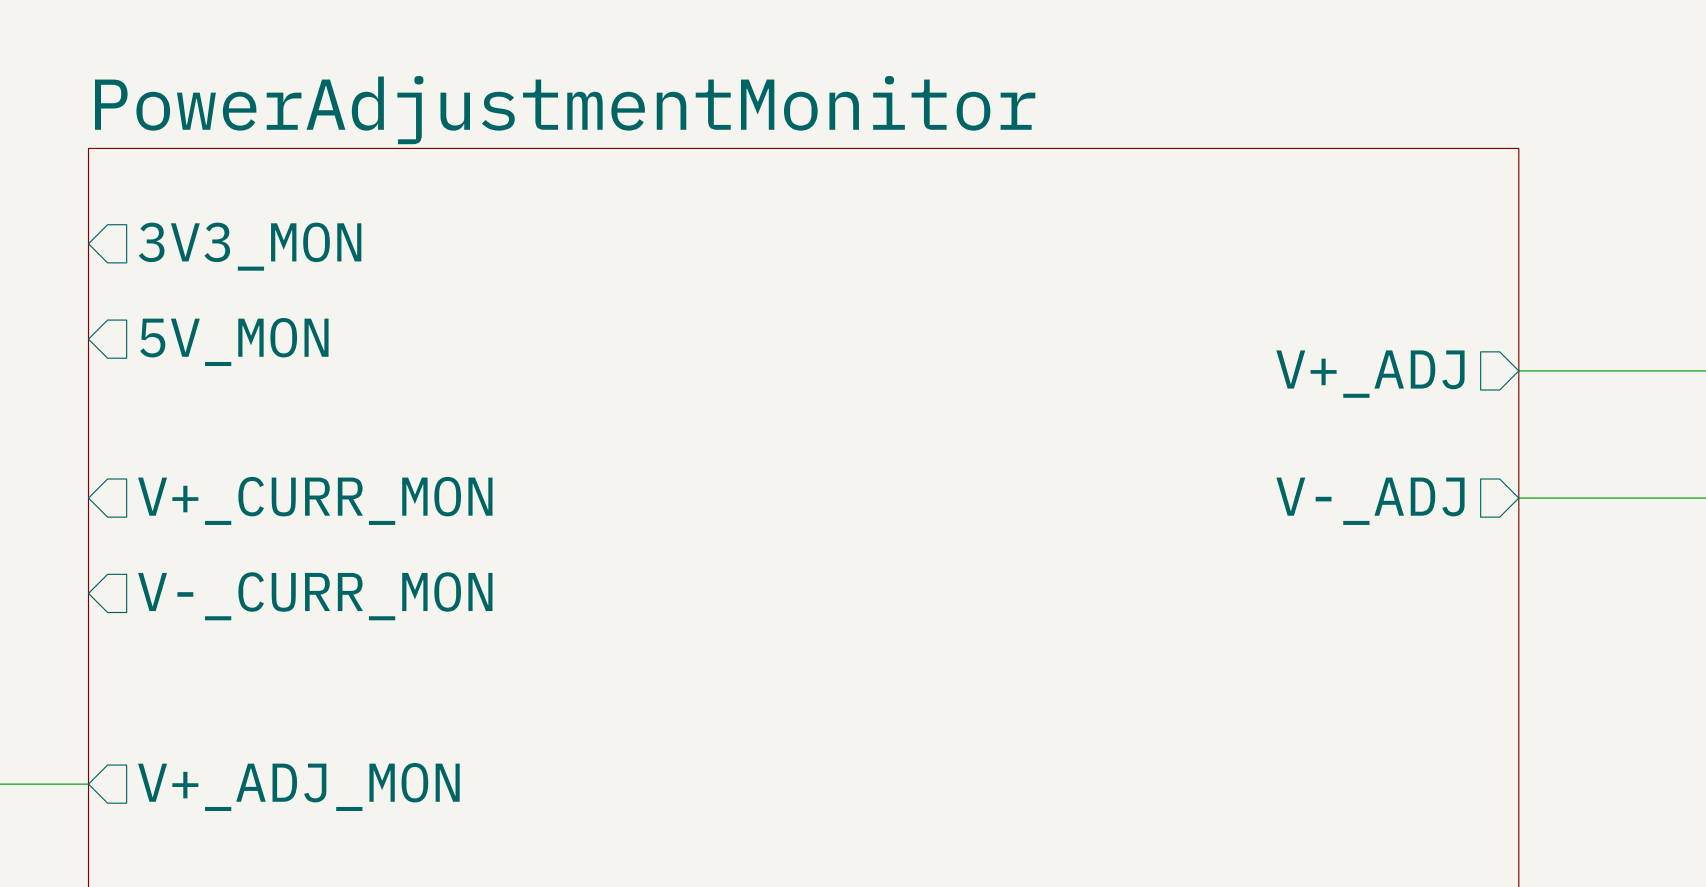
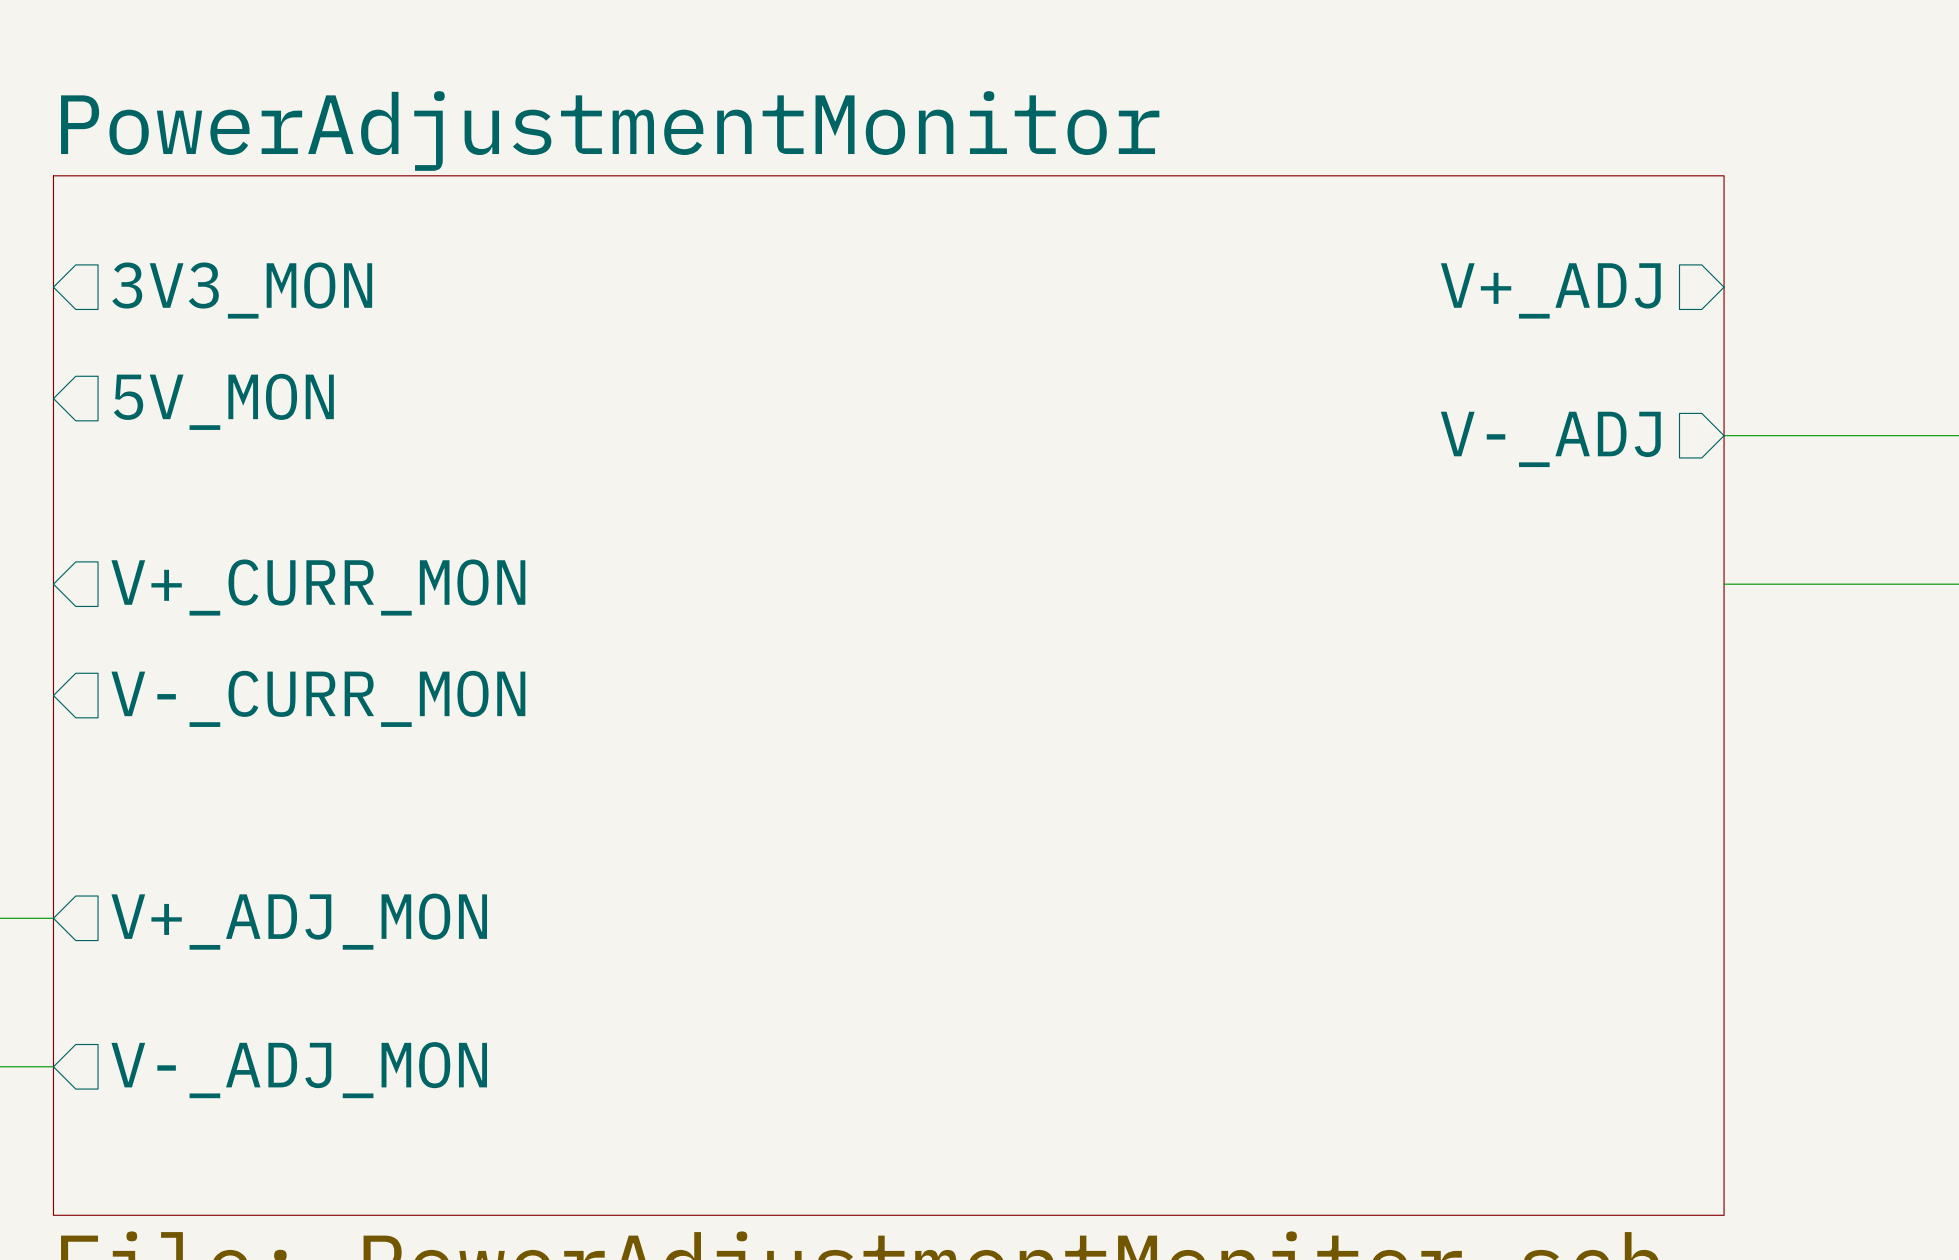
sheet pin: none -> V+_ADJ (1550, 290)
sheet pin: V+_ADJ (1370, 374) -> V-_ADJ (1550, 439)
sheet pin: V-_ADJ (1370, 501) -> none

